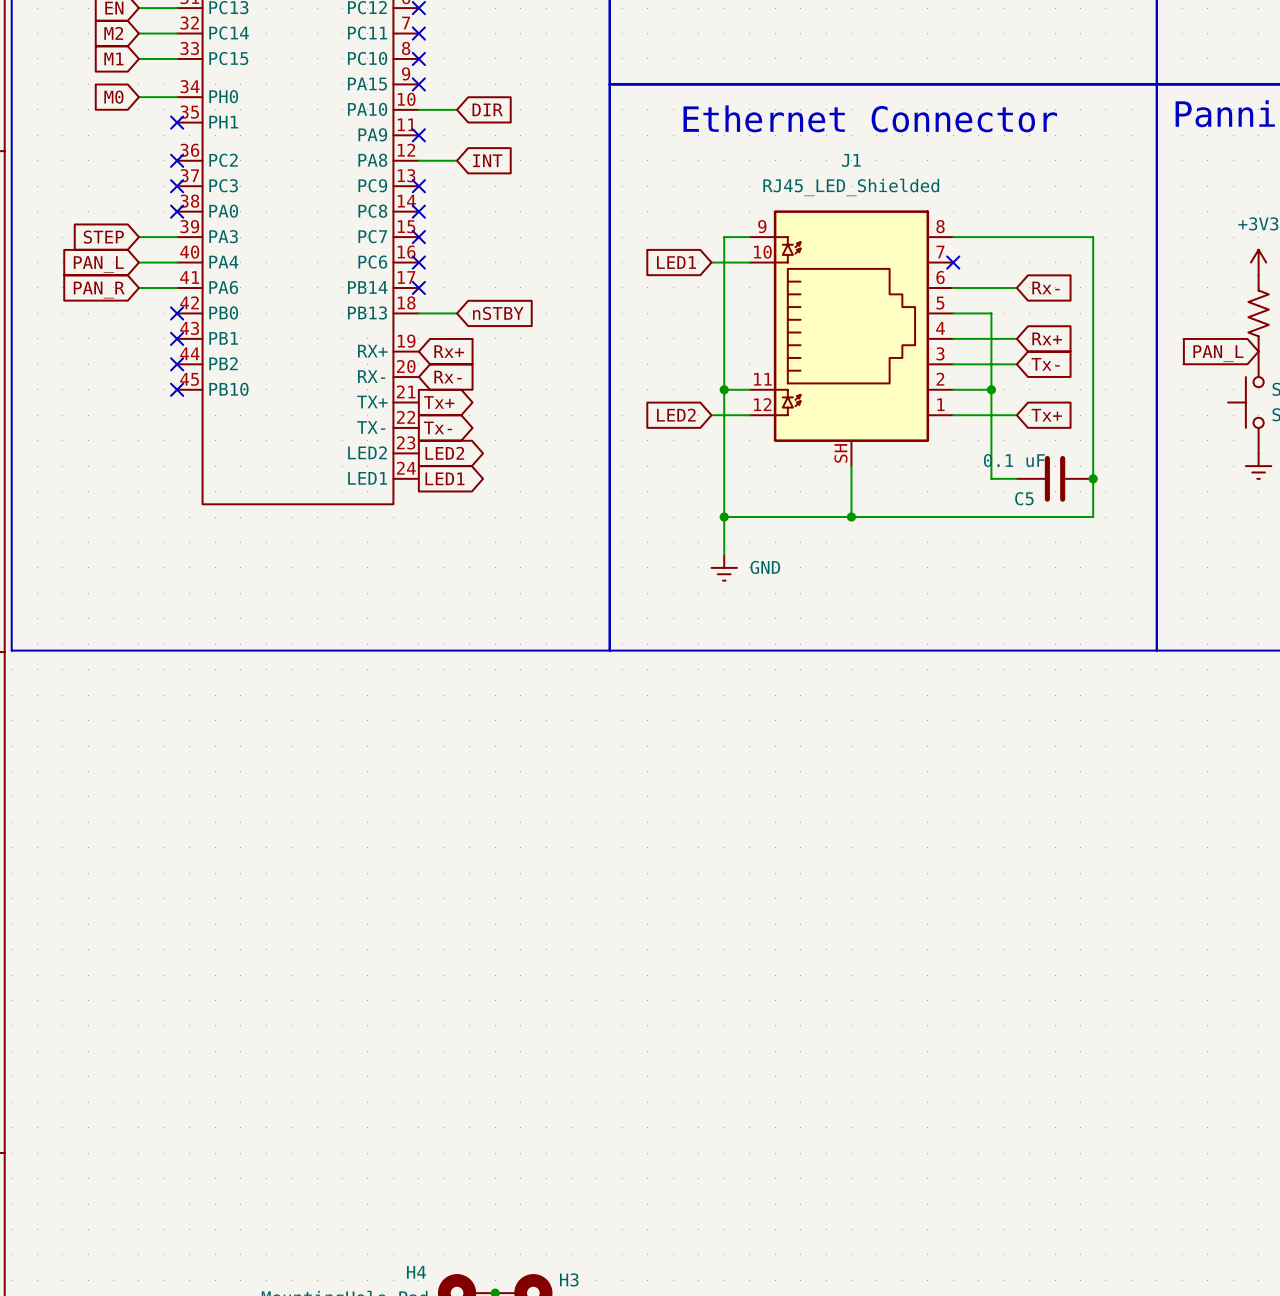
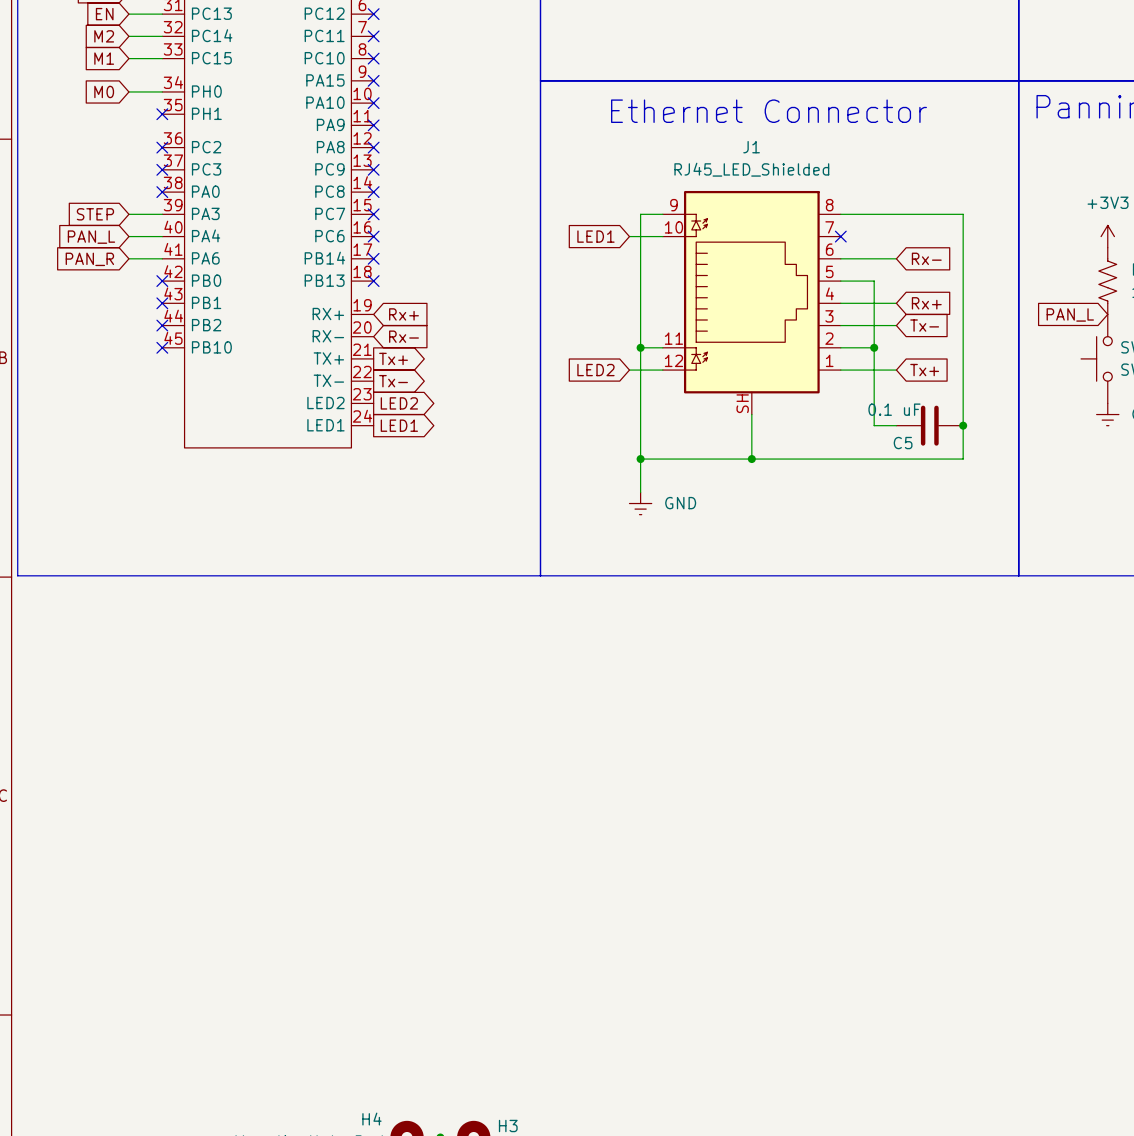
wire: (418, 109) (457, 109) -> none
no-connect mark: none -> (373, 103)
global label: DIR (487, 109) -> none
wire: (418, 160) (457, 160) -> none
no-connect mark: none -> (373, 147)
global label: INT (487, 160) -> none
wire: (418, 313) (457, 313) -> none
no-connect mark: none -> (373, 281)
global label: nSTBY (498, 313) -> none

